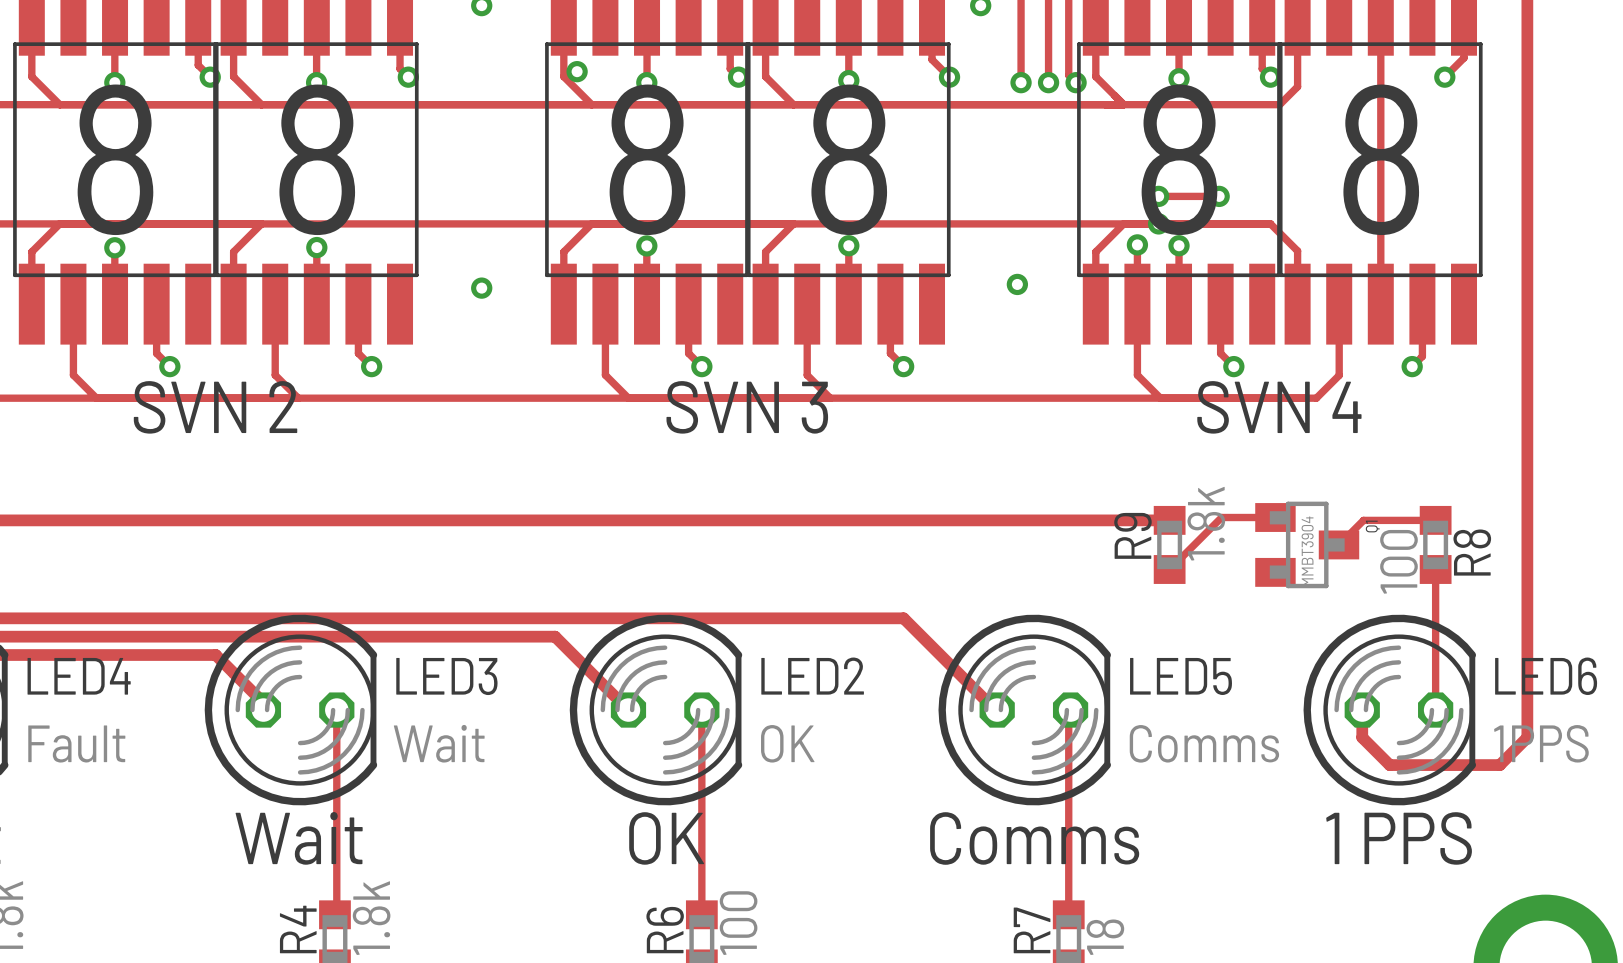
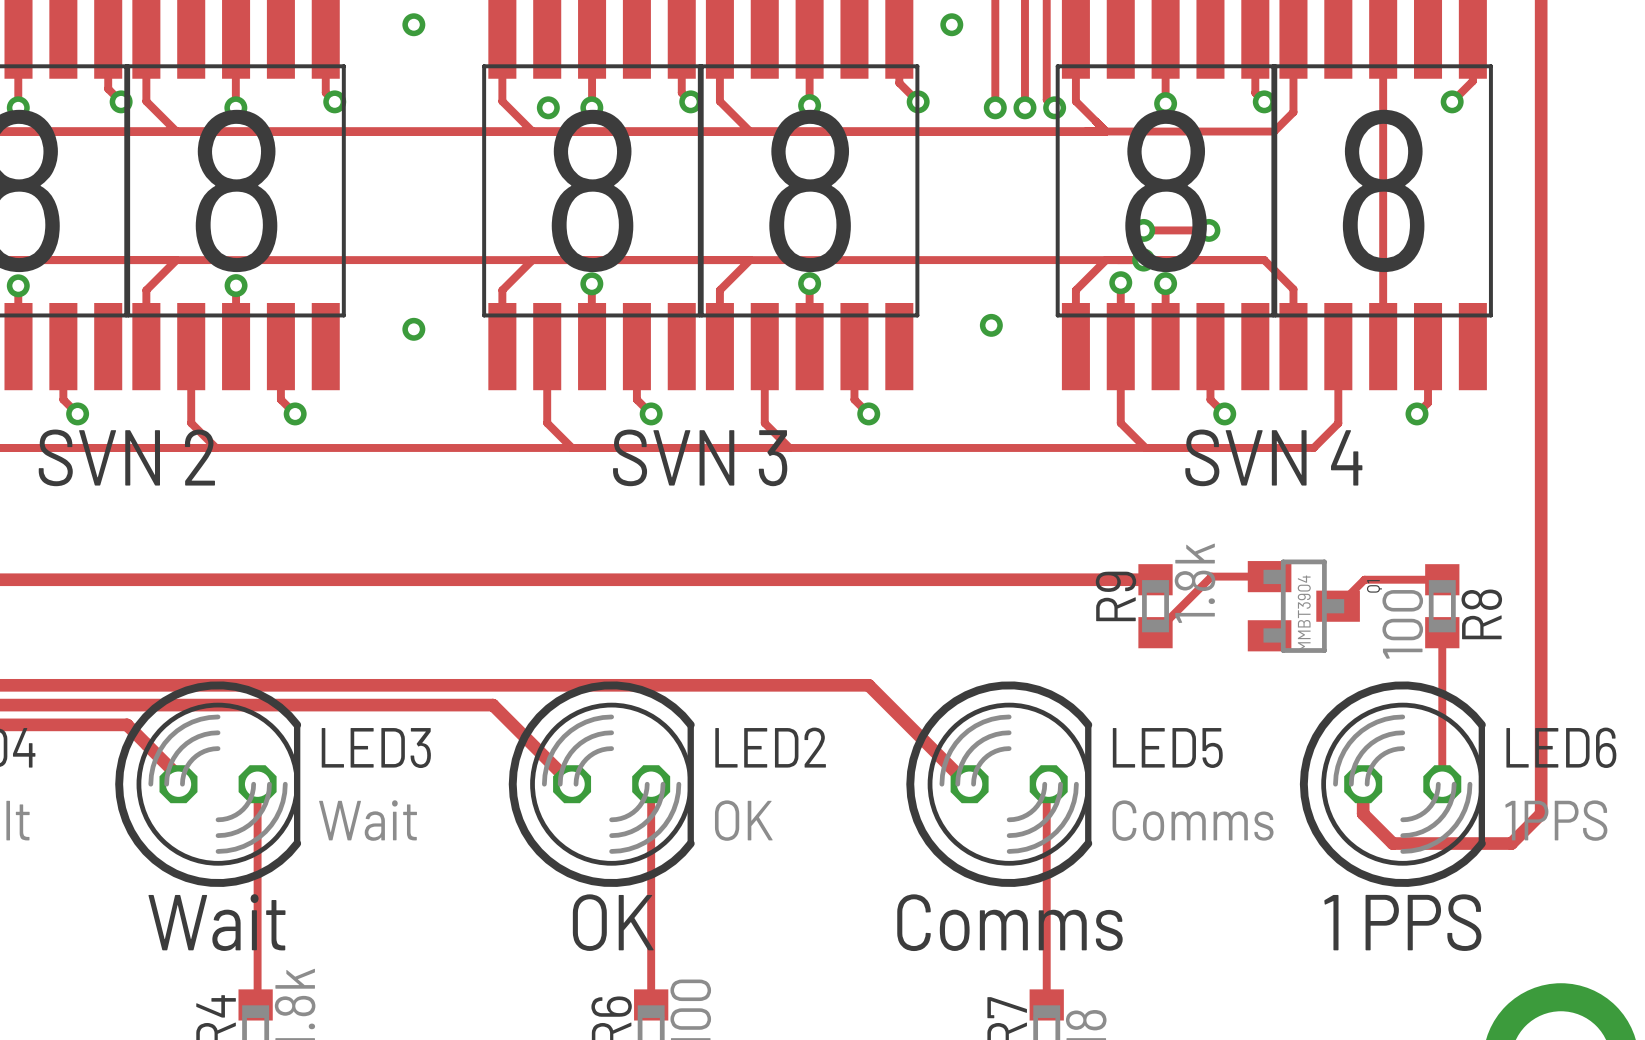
via position: (577, 71) -> (548, 107)

